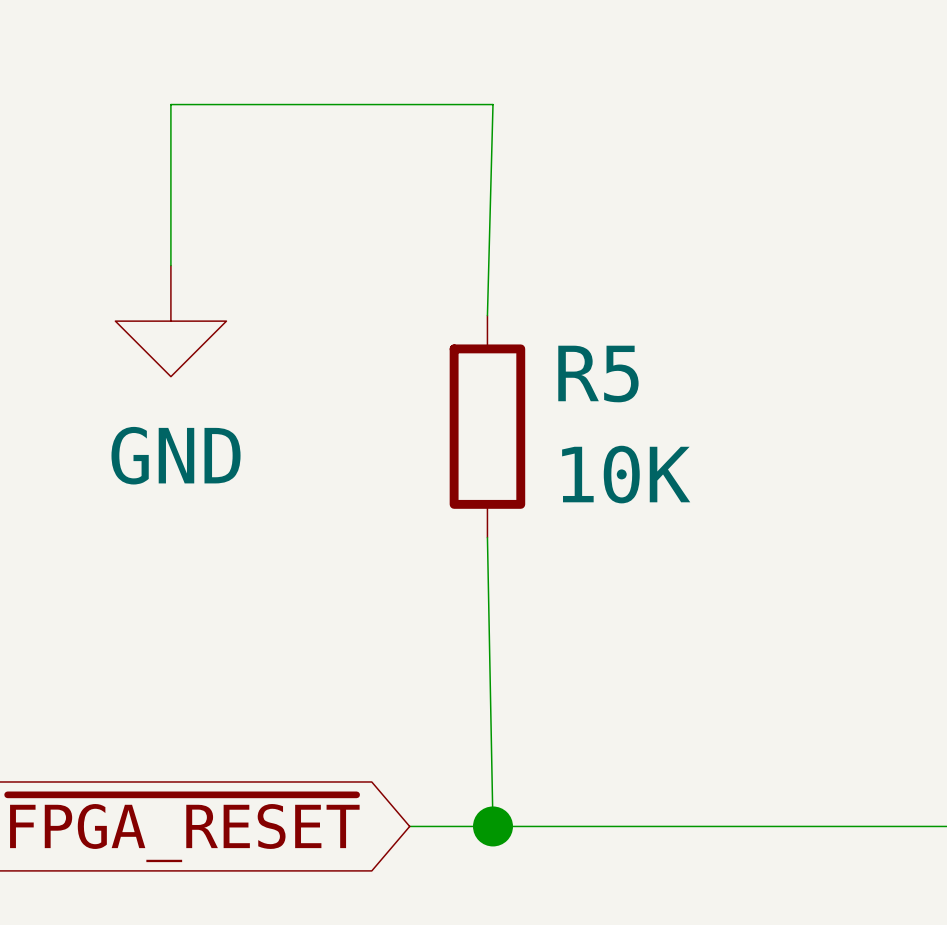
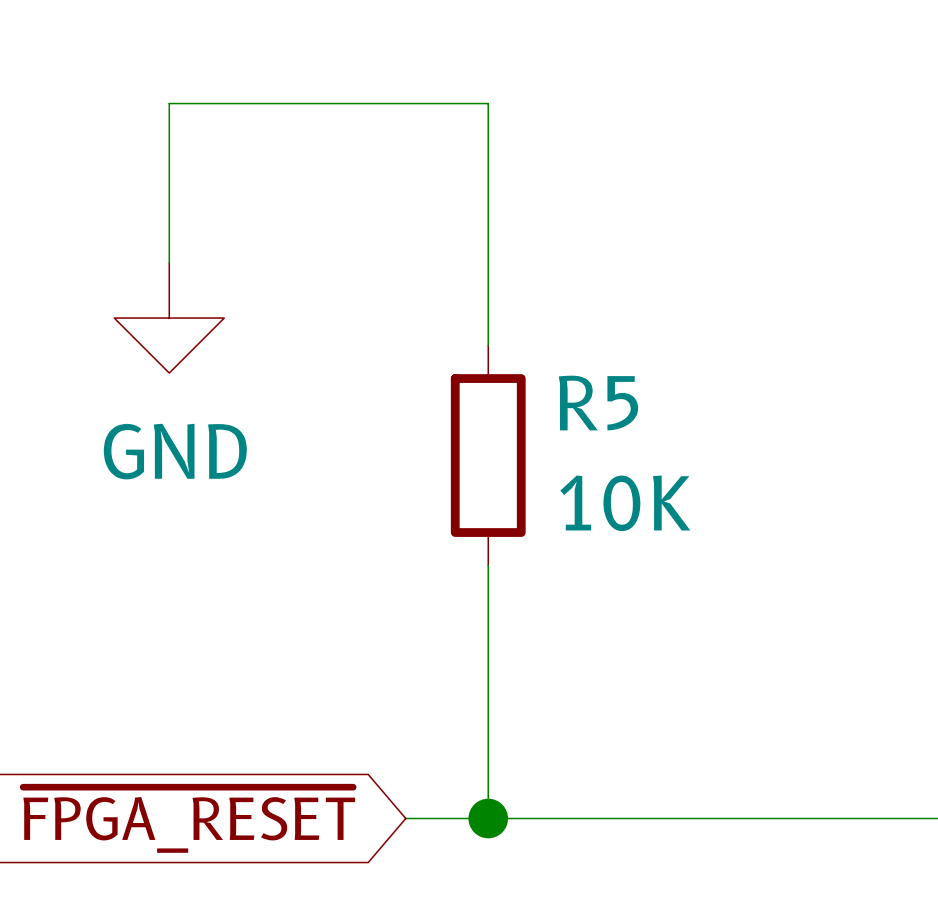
wire: (492, 104) (487, 315) -> (488, 103) (488, 345)
R5 position: (487, 426) -> (488, 455)
wire: (487, 537) (492, 826) -> (488, 565) (488, 818)

